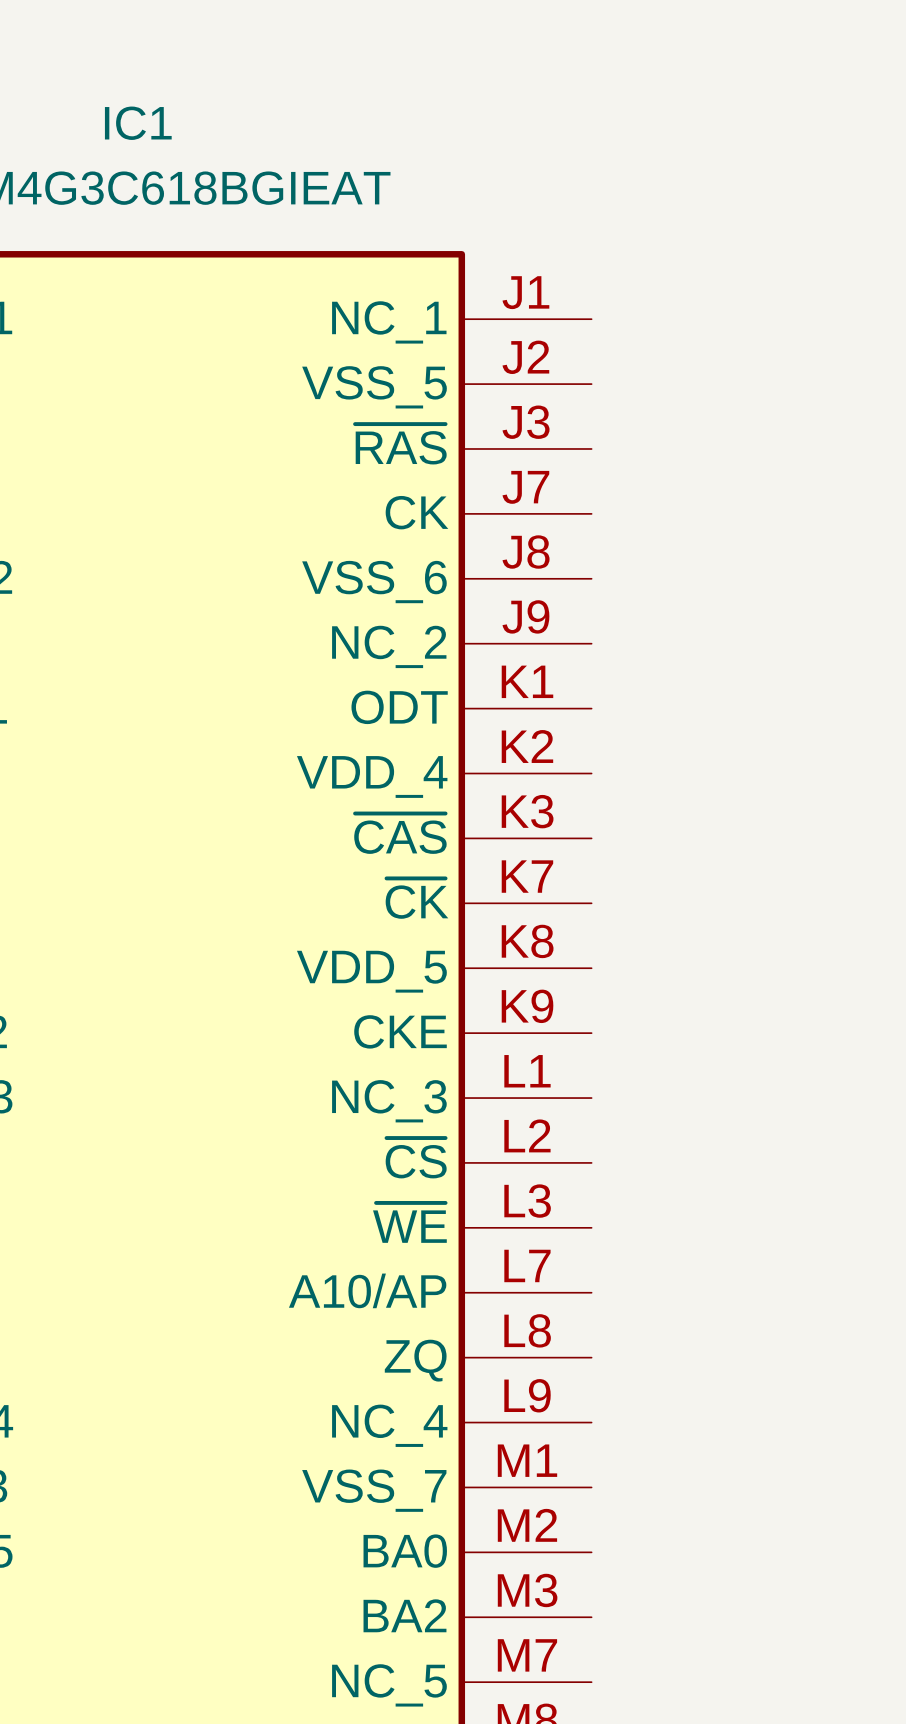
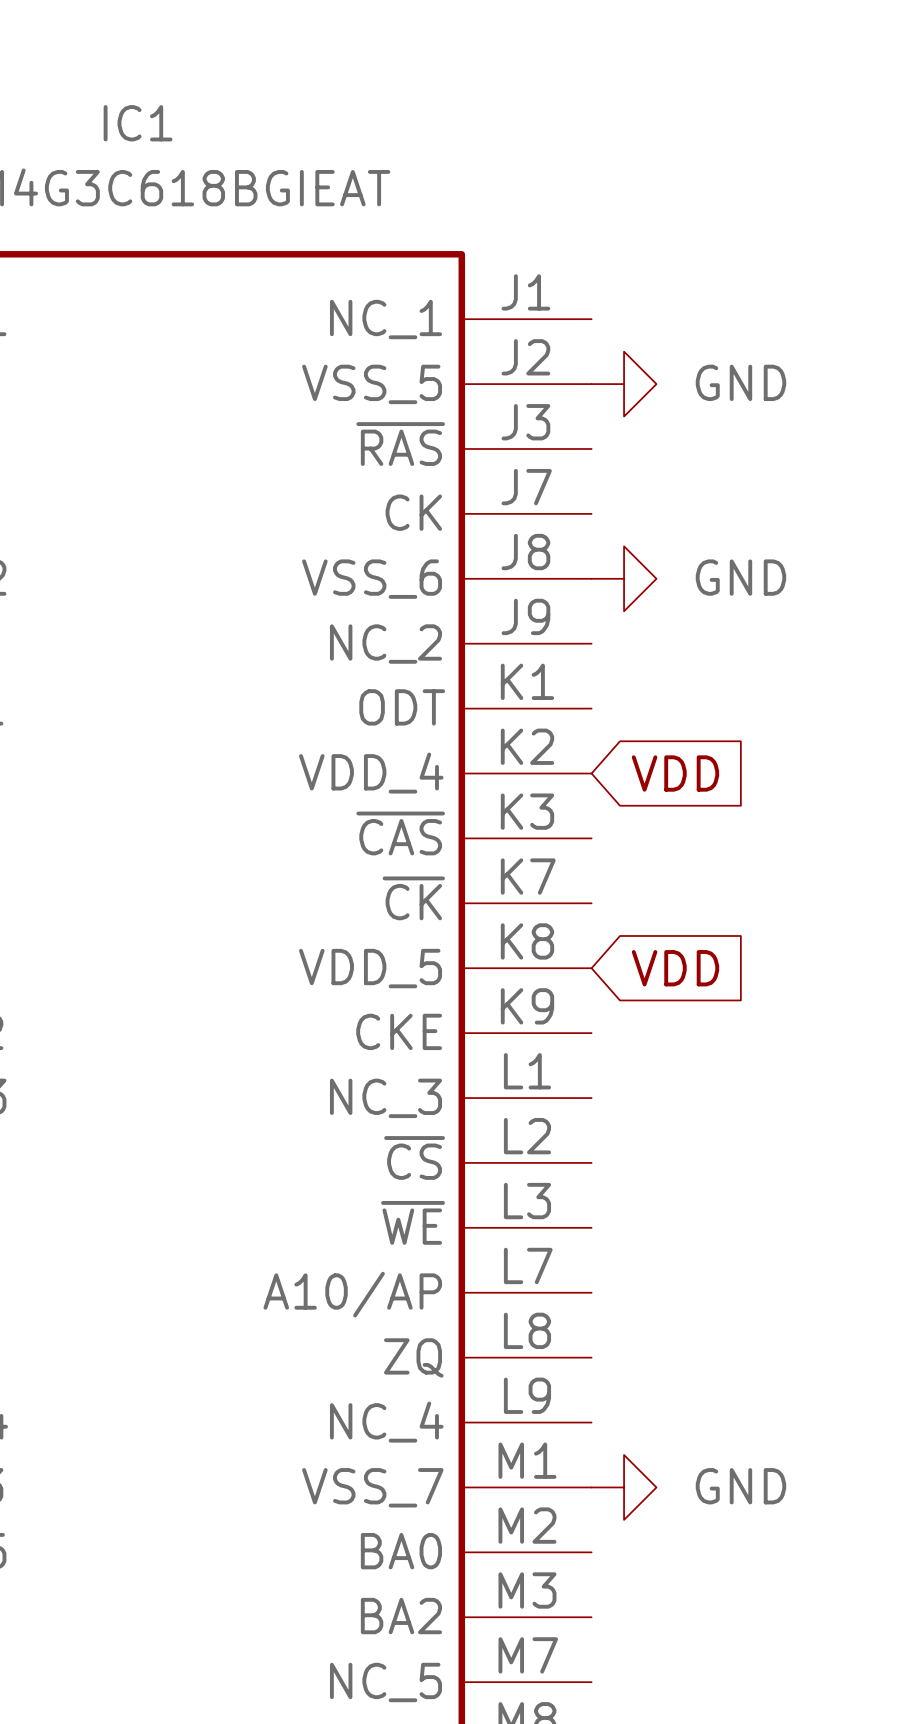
power symbol: none -> GND (624, 384)
power symbol: none -> GND (624, 578)
global label: none -> VDD (675, 773)
global label: none -> VDD (675, 968)
power symbol: none -> GND (624, 1487)

